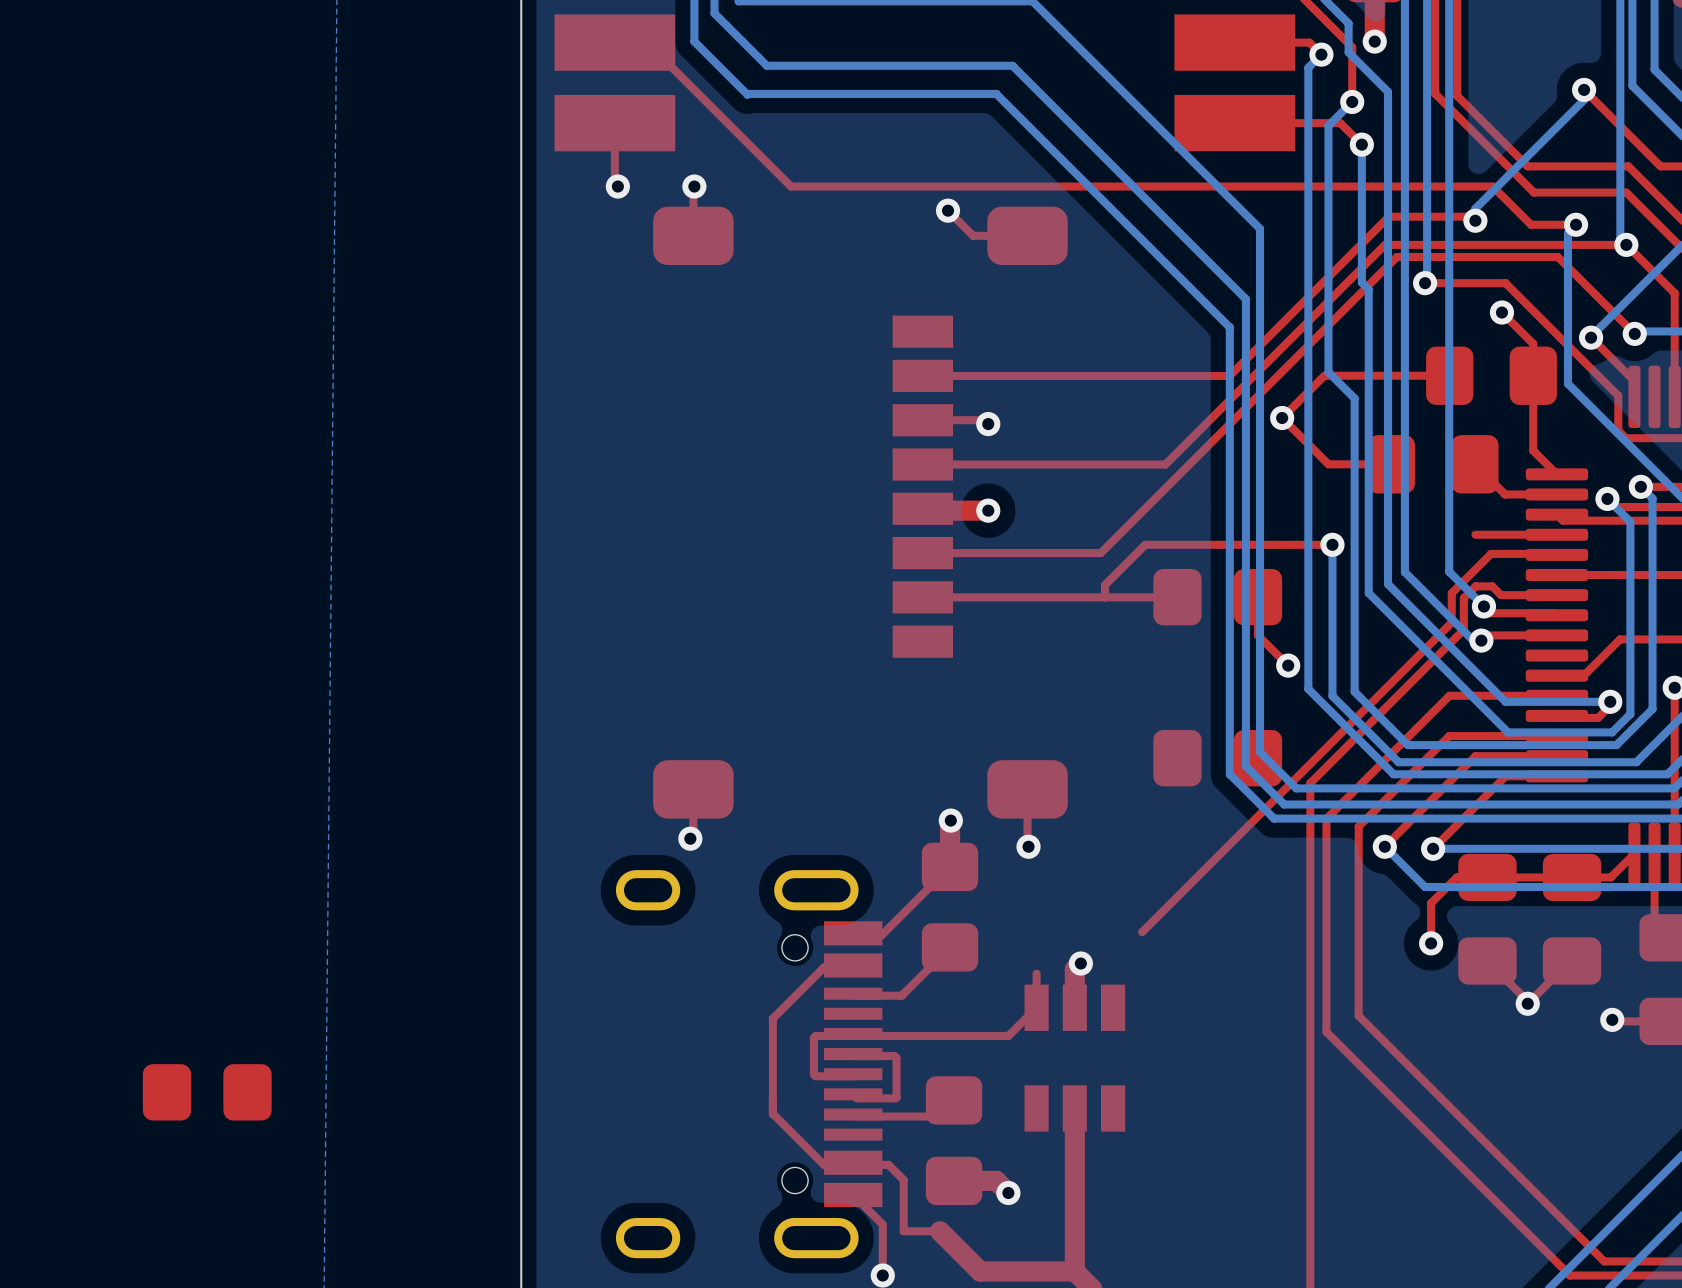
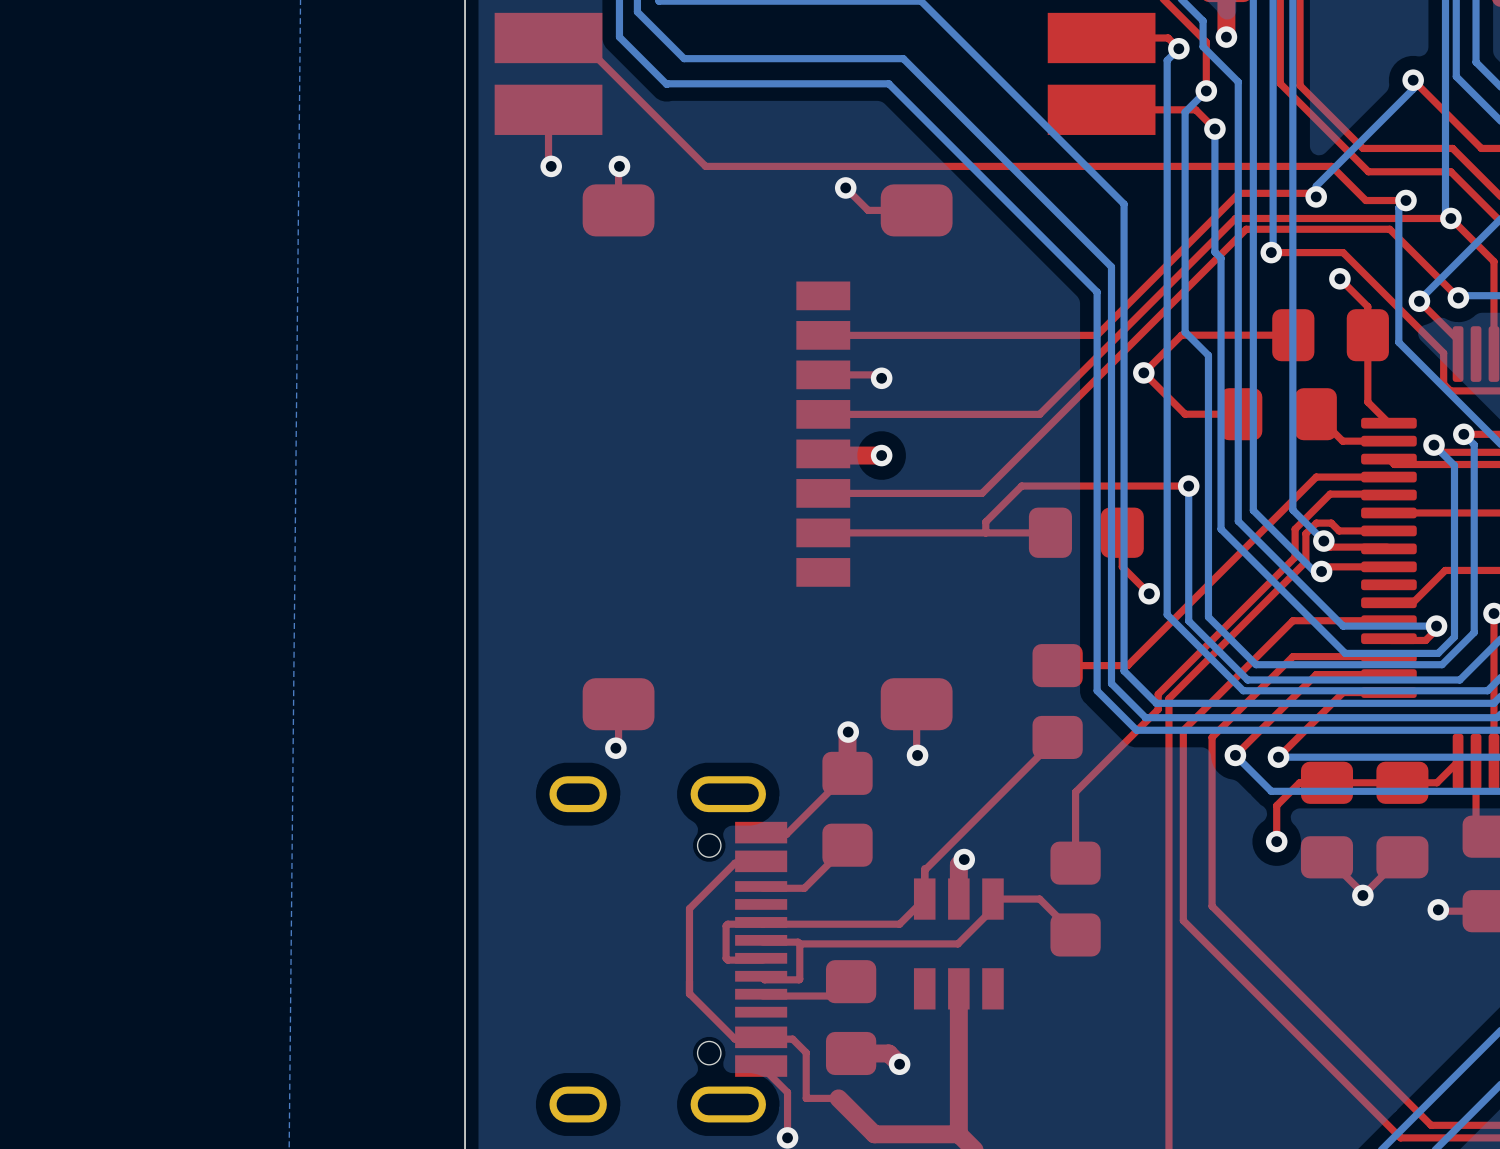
top track: none -> (1316, 477) (1127, 665) (1057, 665)
top track: (1451, 622) (1142, 932) -> (1295, 555) (1158, 694) (1158, 709) (1075, 792) (1075, 863)
part rotation: 0° (1217, 758) -> 90° clockwise (1057, 701)
top track: none -> (1057, 737) (924, 870)
part: none -> (1075, 899)
top track: none -> (1075, 934) (1039, 899) (992, 899) (992, 908) (957, 943) (799, 943)
part: (207, 1092) -> none

